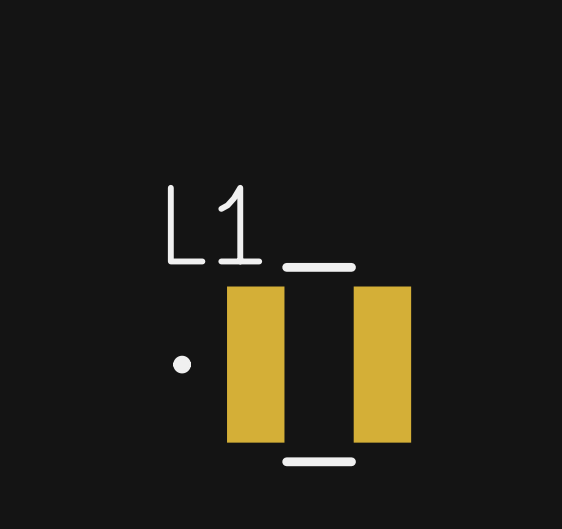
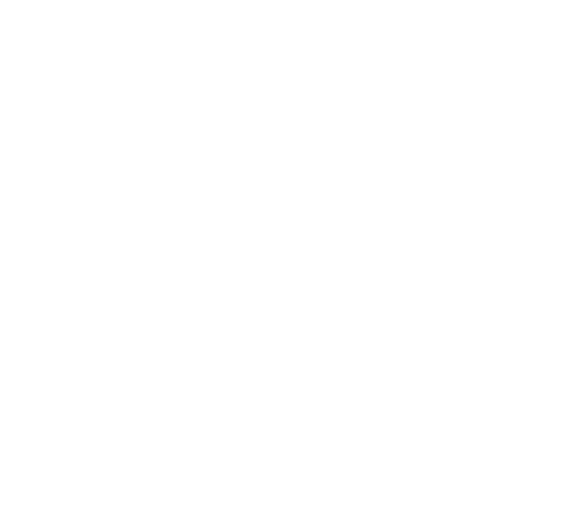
L1: (292, 364) -> none

